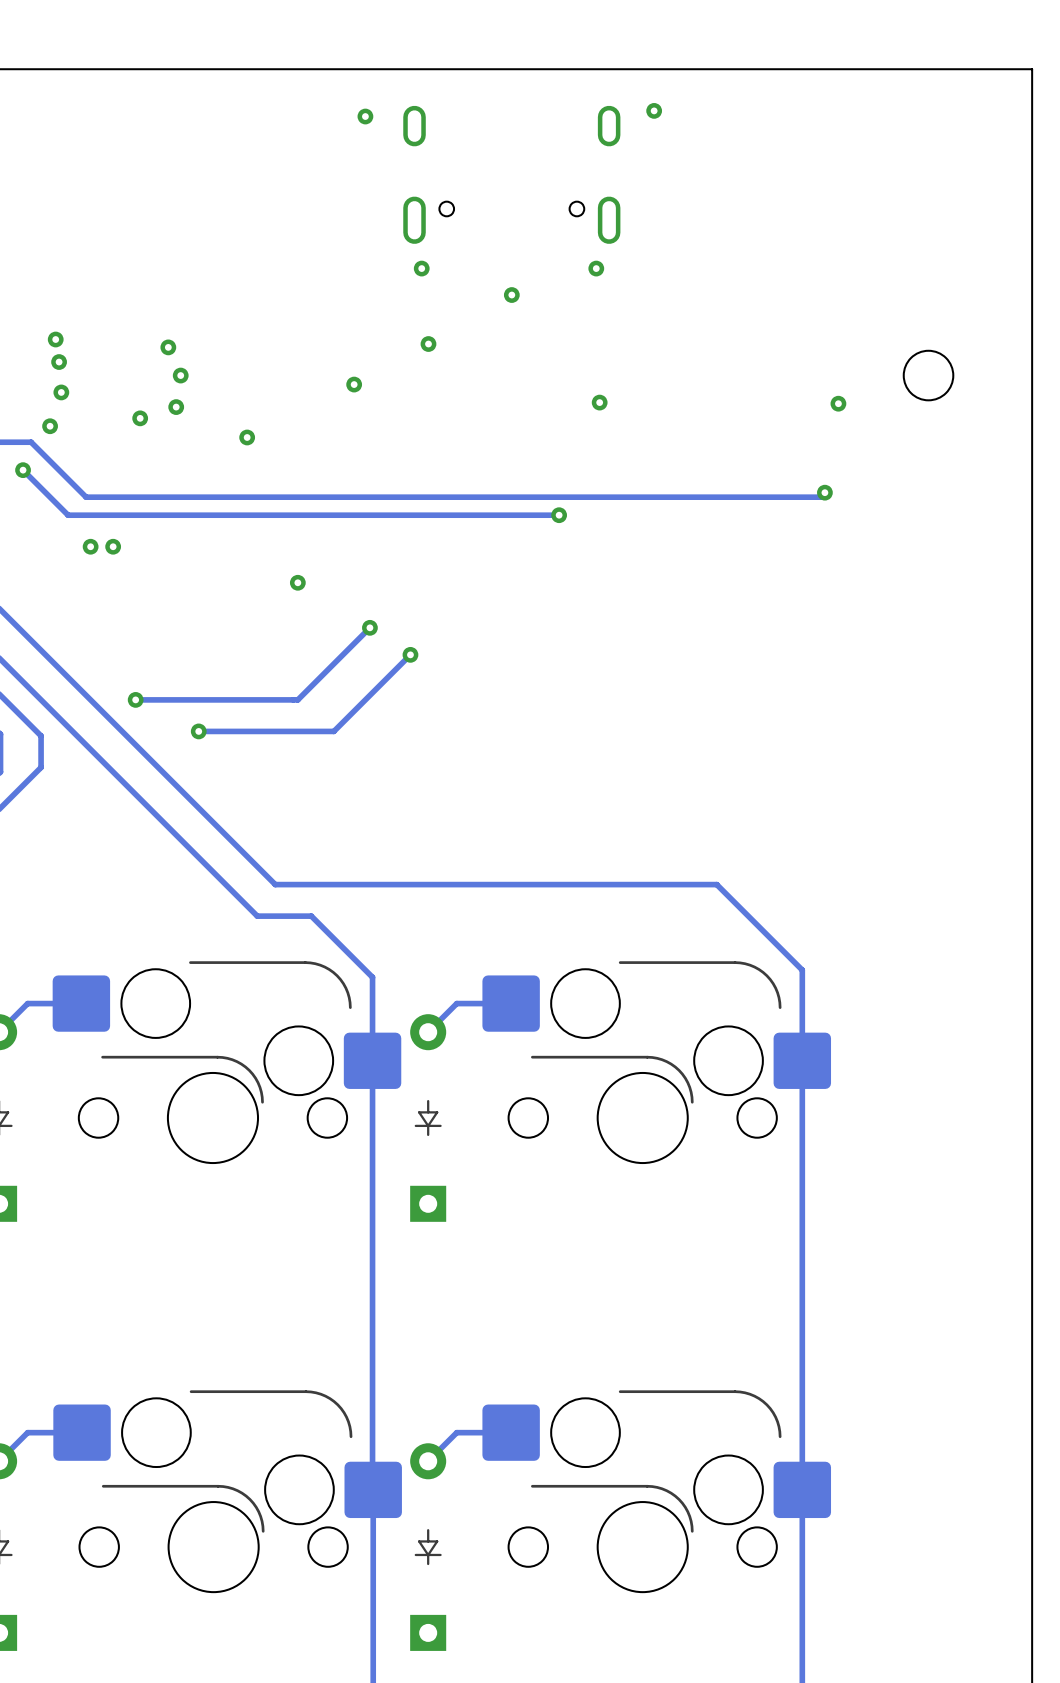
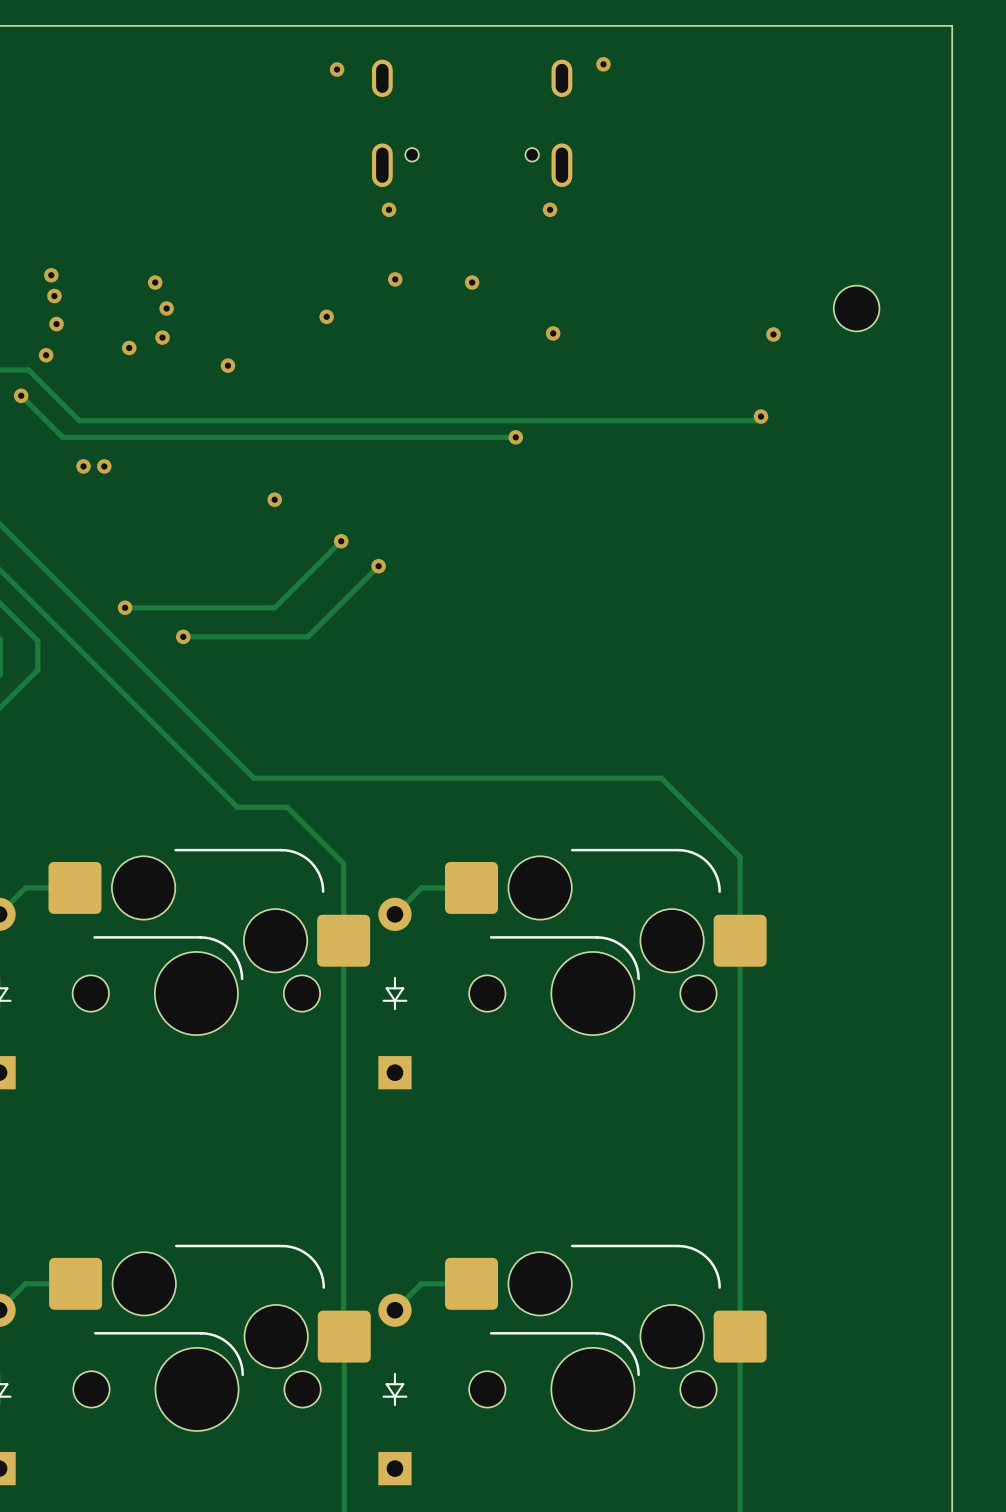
via position: (511, 295) -> (472, 282)

